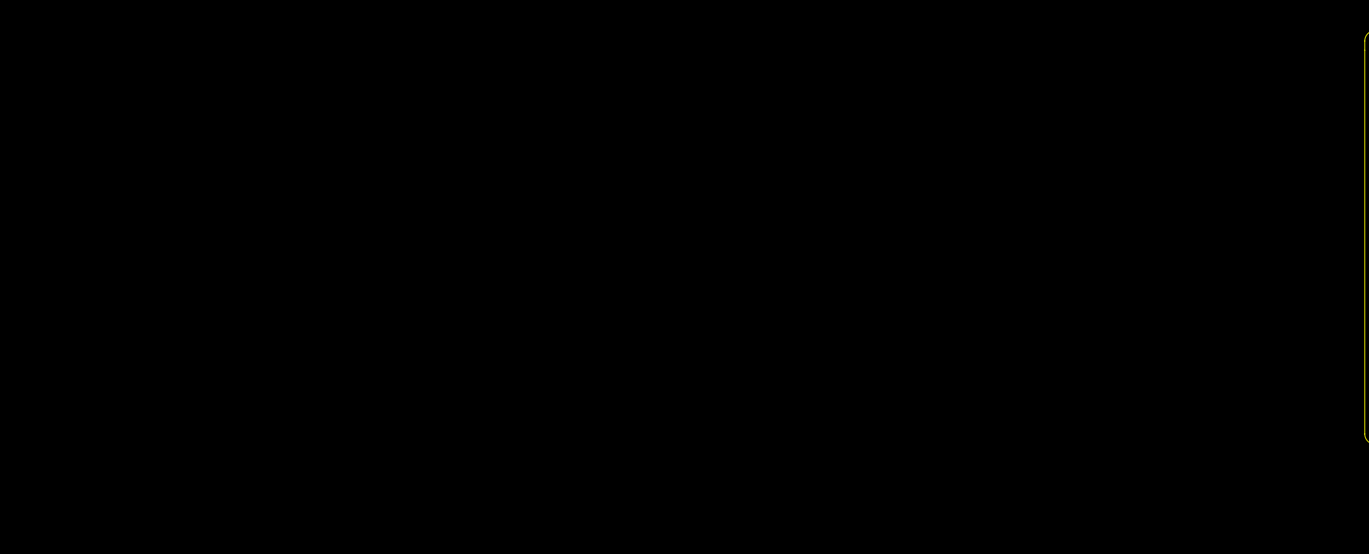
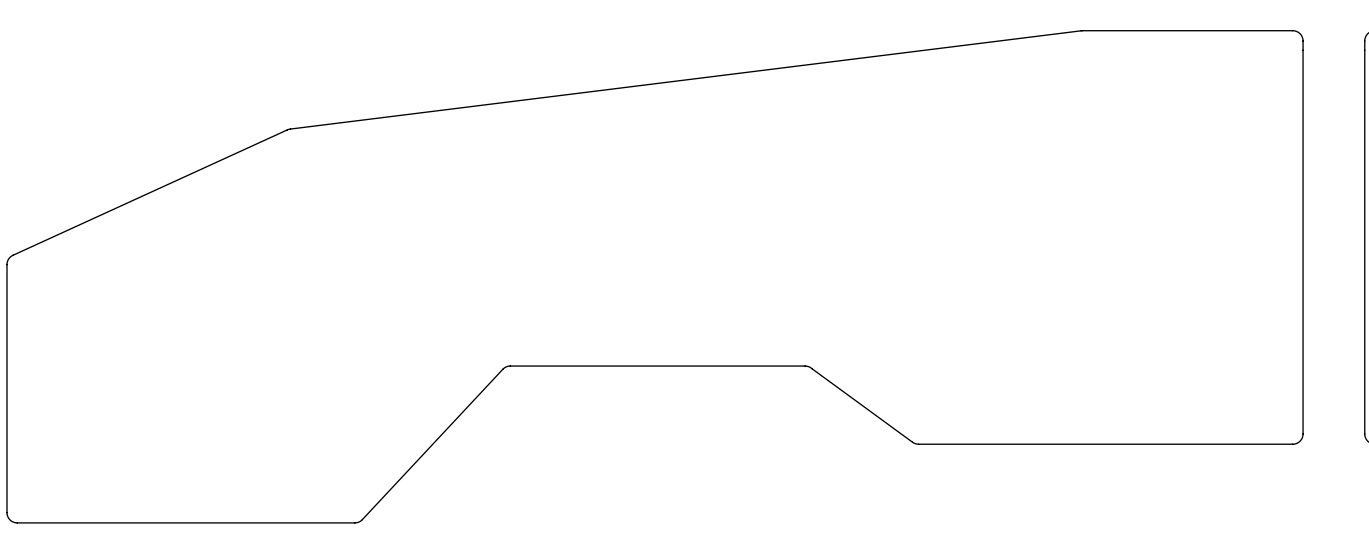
board edge: none -> (1082, 30) (1292, 30) (1298, 32) (1302, 36) (1303, 433) (1301, 439) (1297, 443) (917, 444) (806, 366) (509, 366) (502, 369) (357, 522) (17, 522) (11, 521) (8, 517) (6, 264) (8, 259) (12, 255) (287, 129) (1082, 30)

